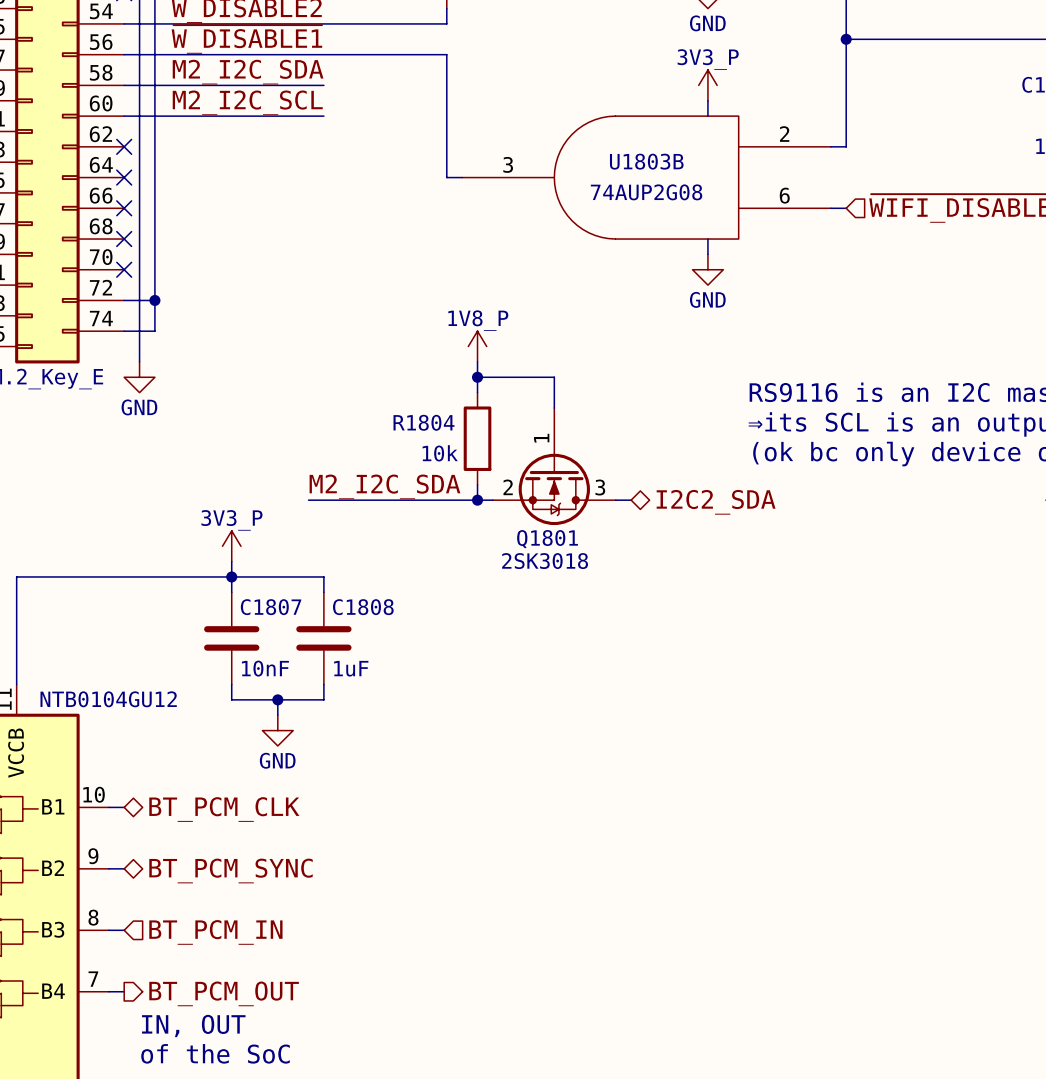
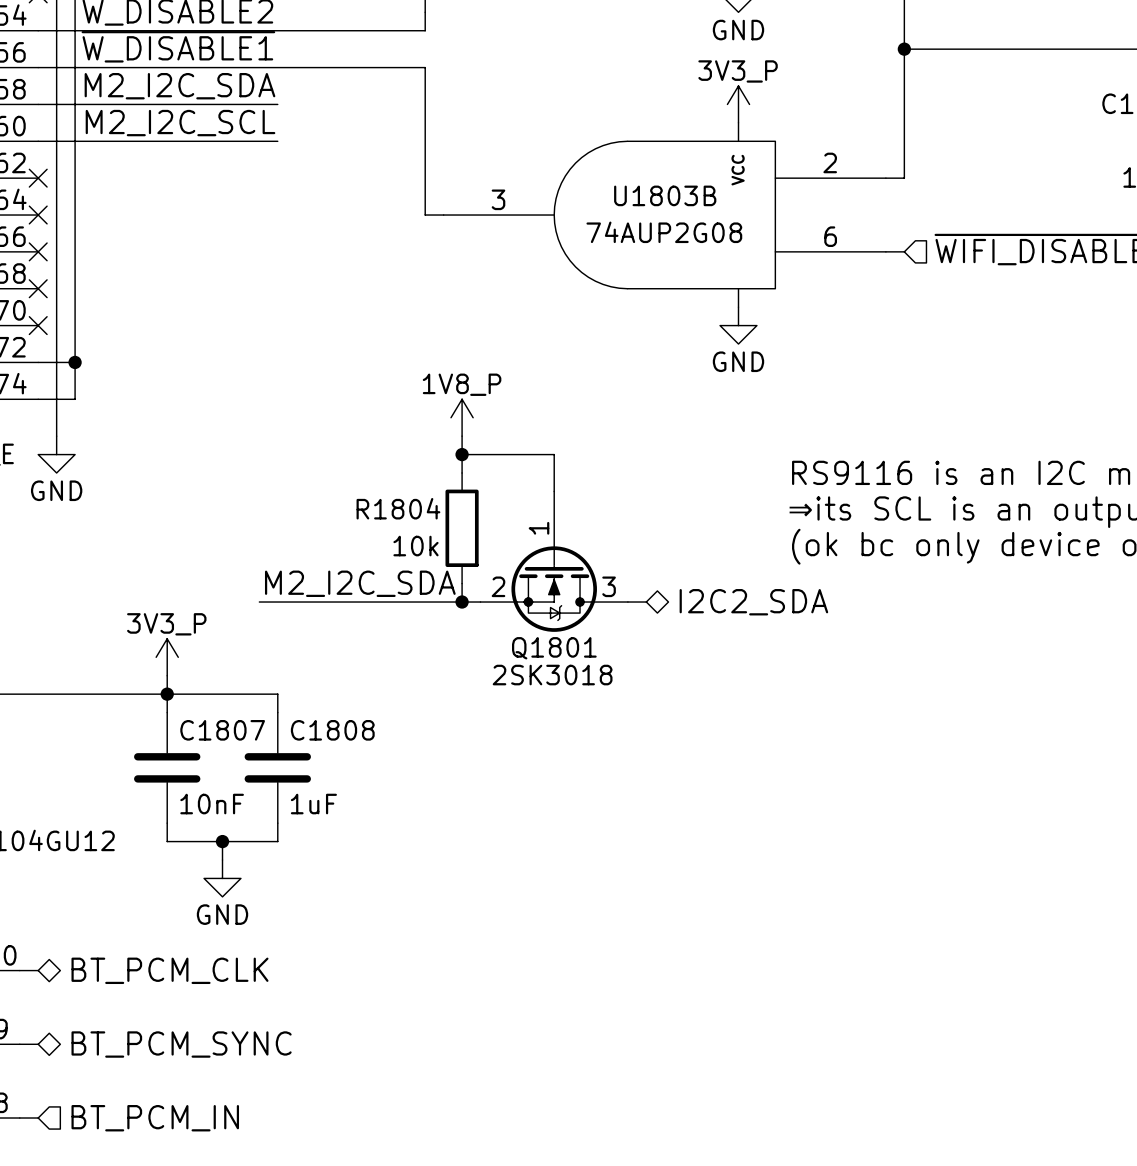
U1803B pin name: none -> VCC (738, 170)

